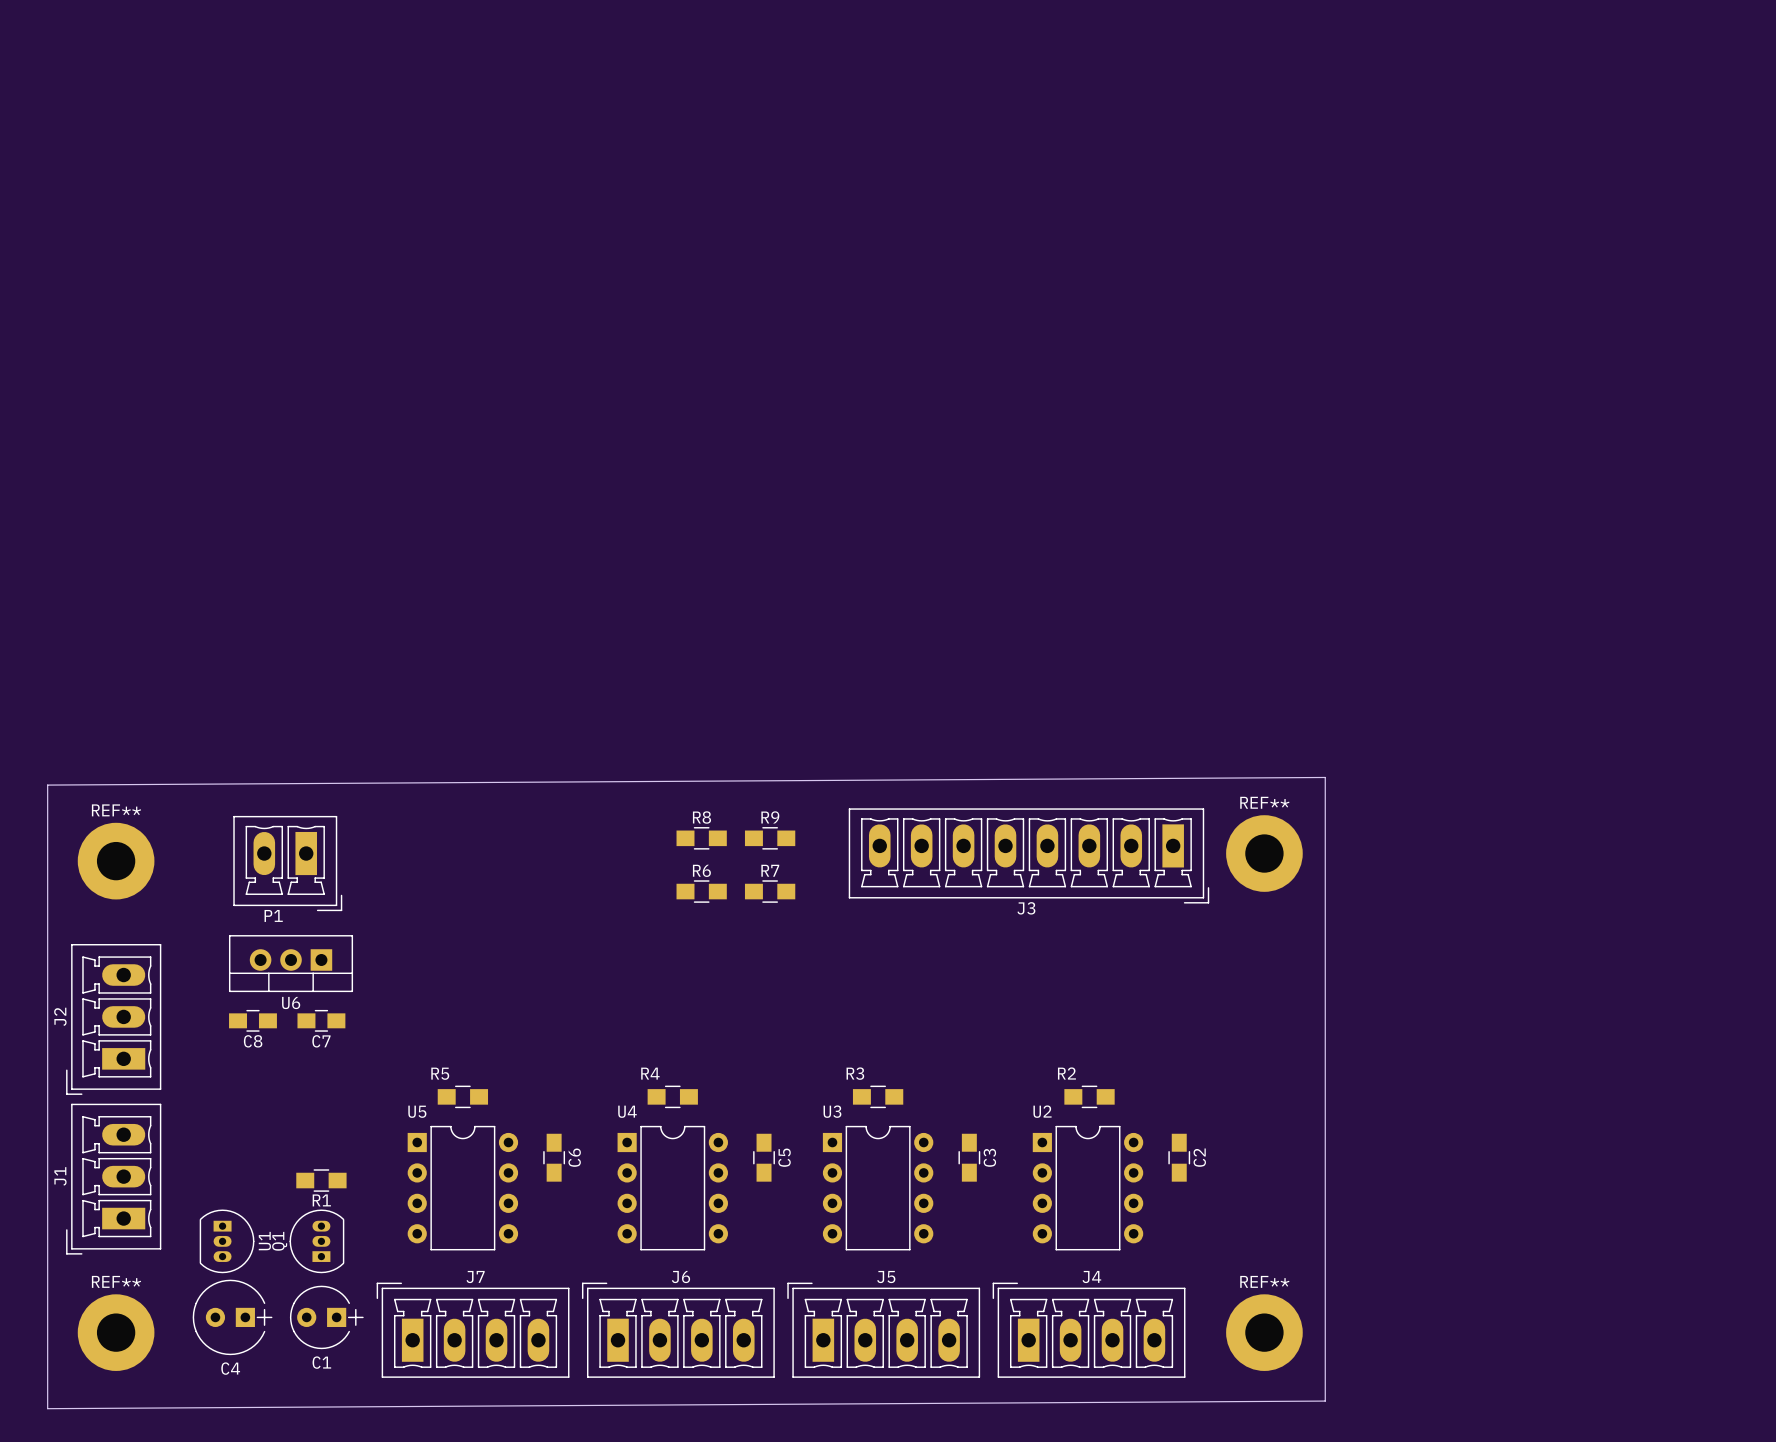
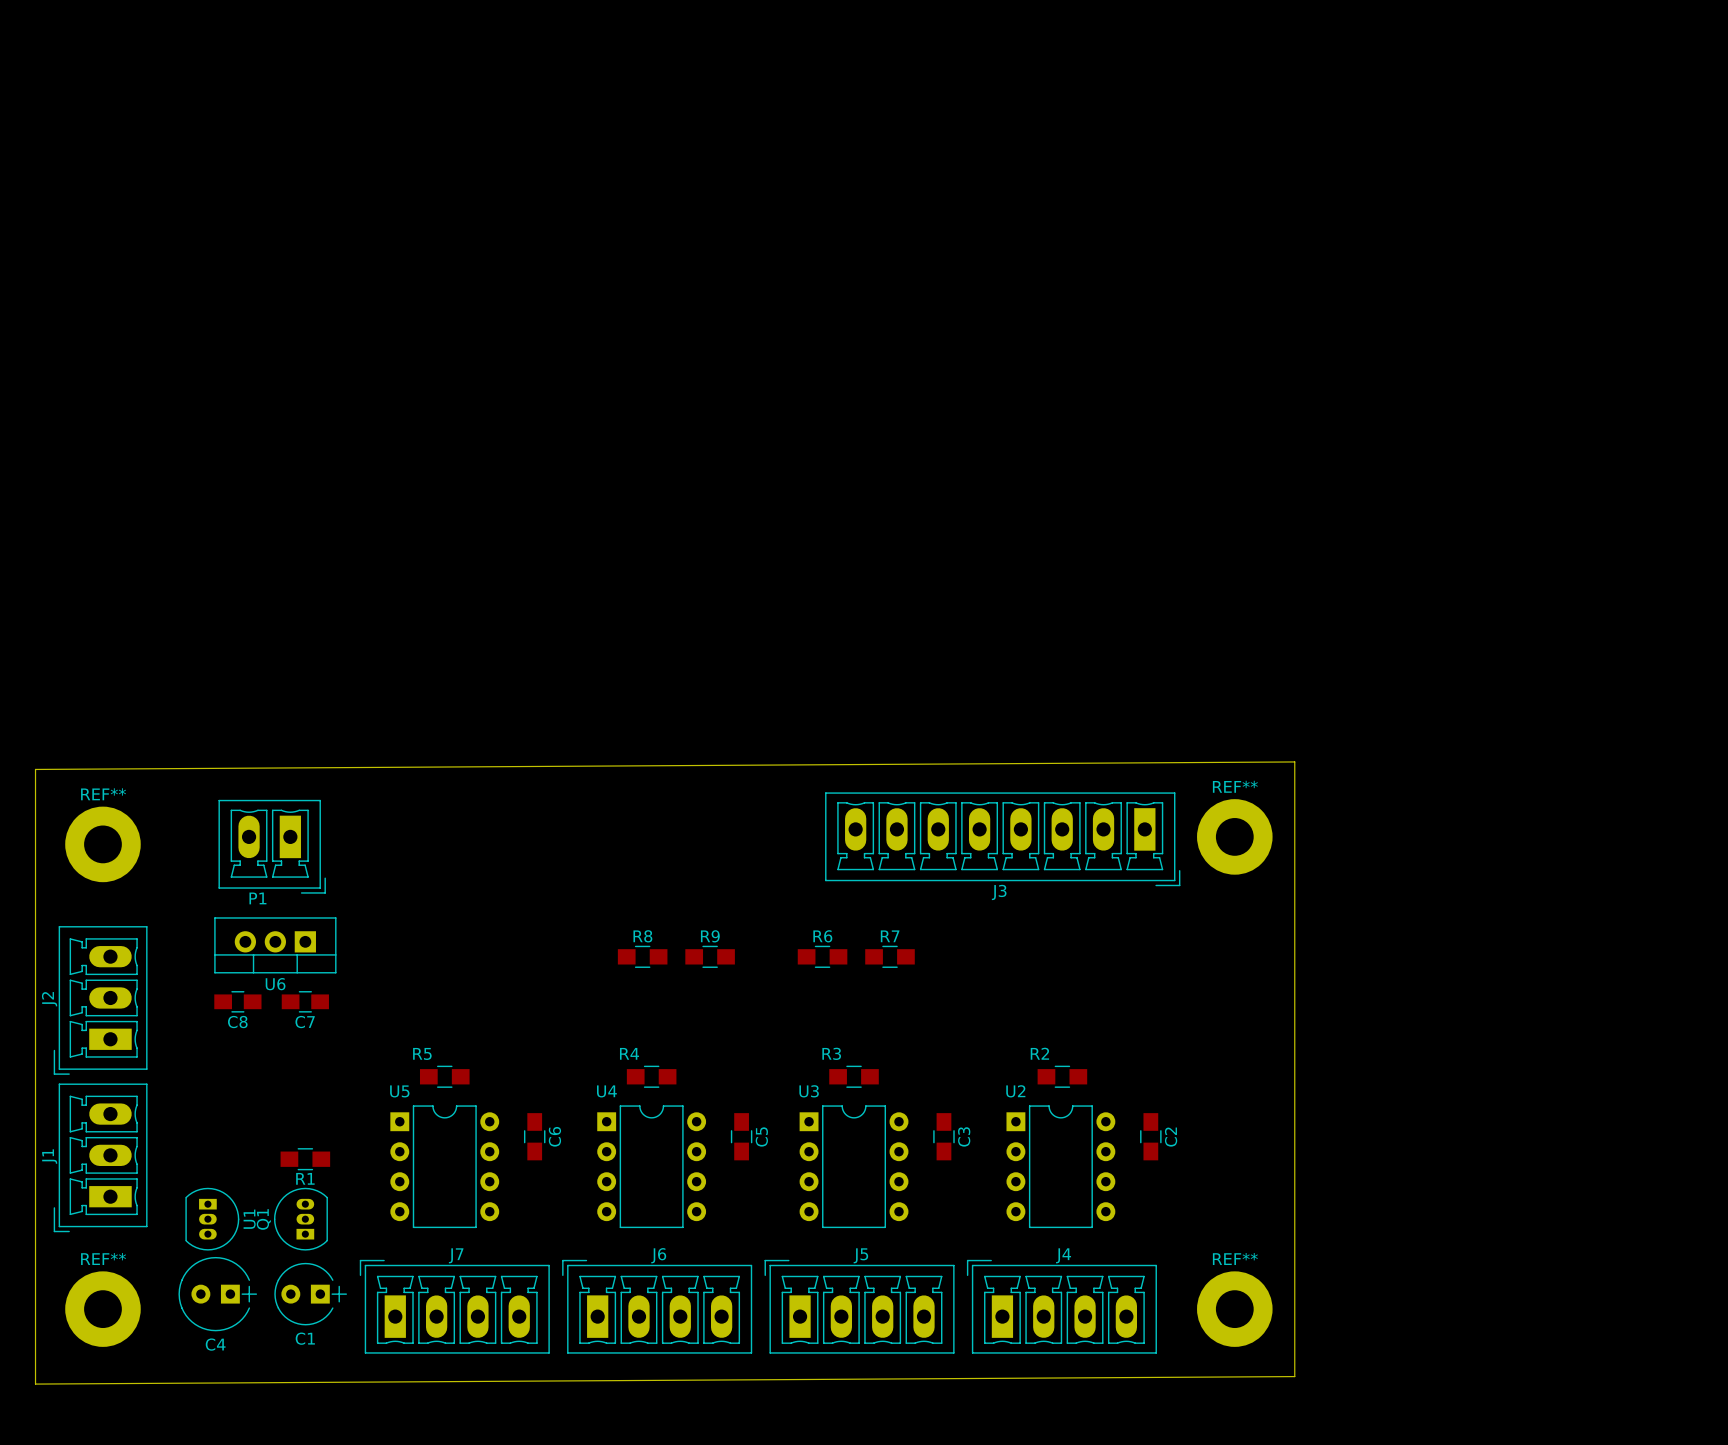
R8 position: (701, 838) -> (642, 956)
R9 position: (770, 838) -> (710, 956)
R6 position: (701, 891) -> (822, 956)
R7 position: (770, 891) -> (890, 956)

